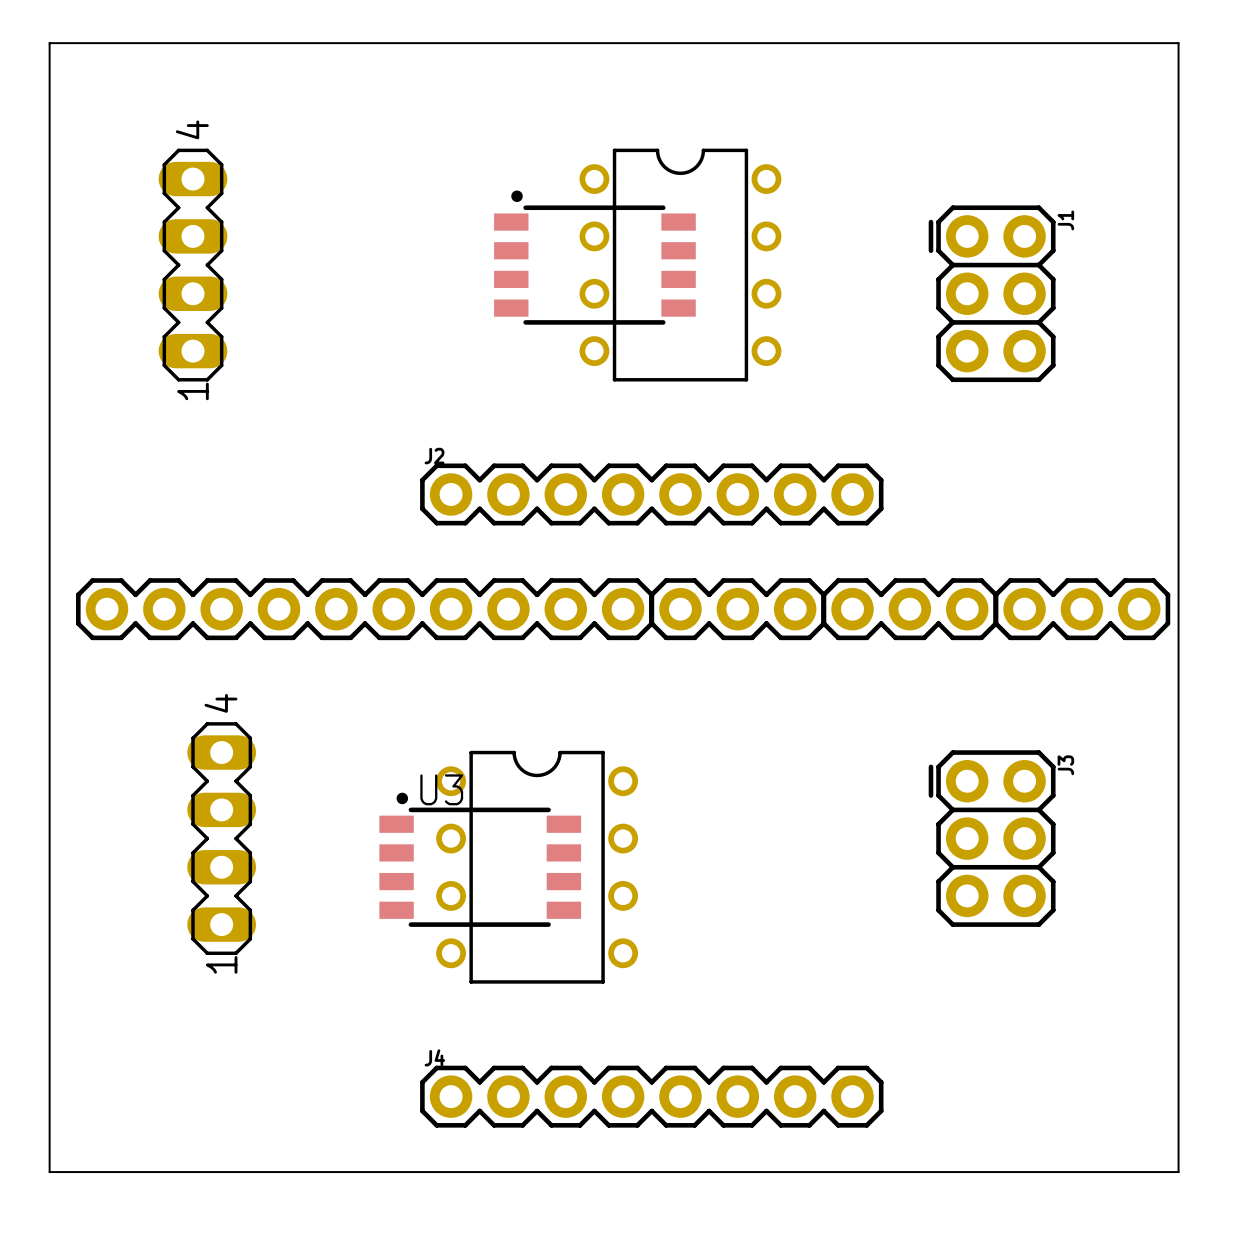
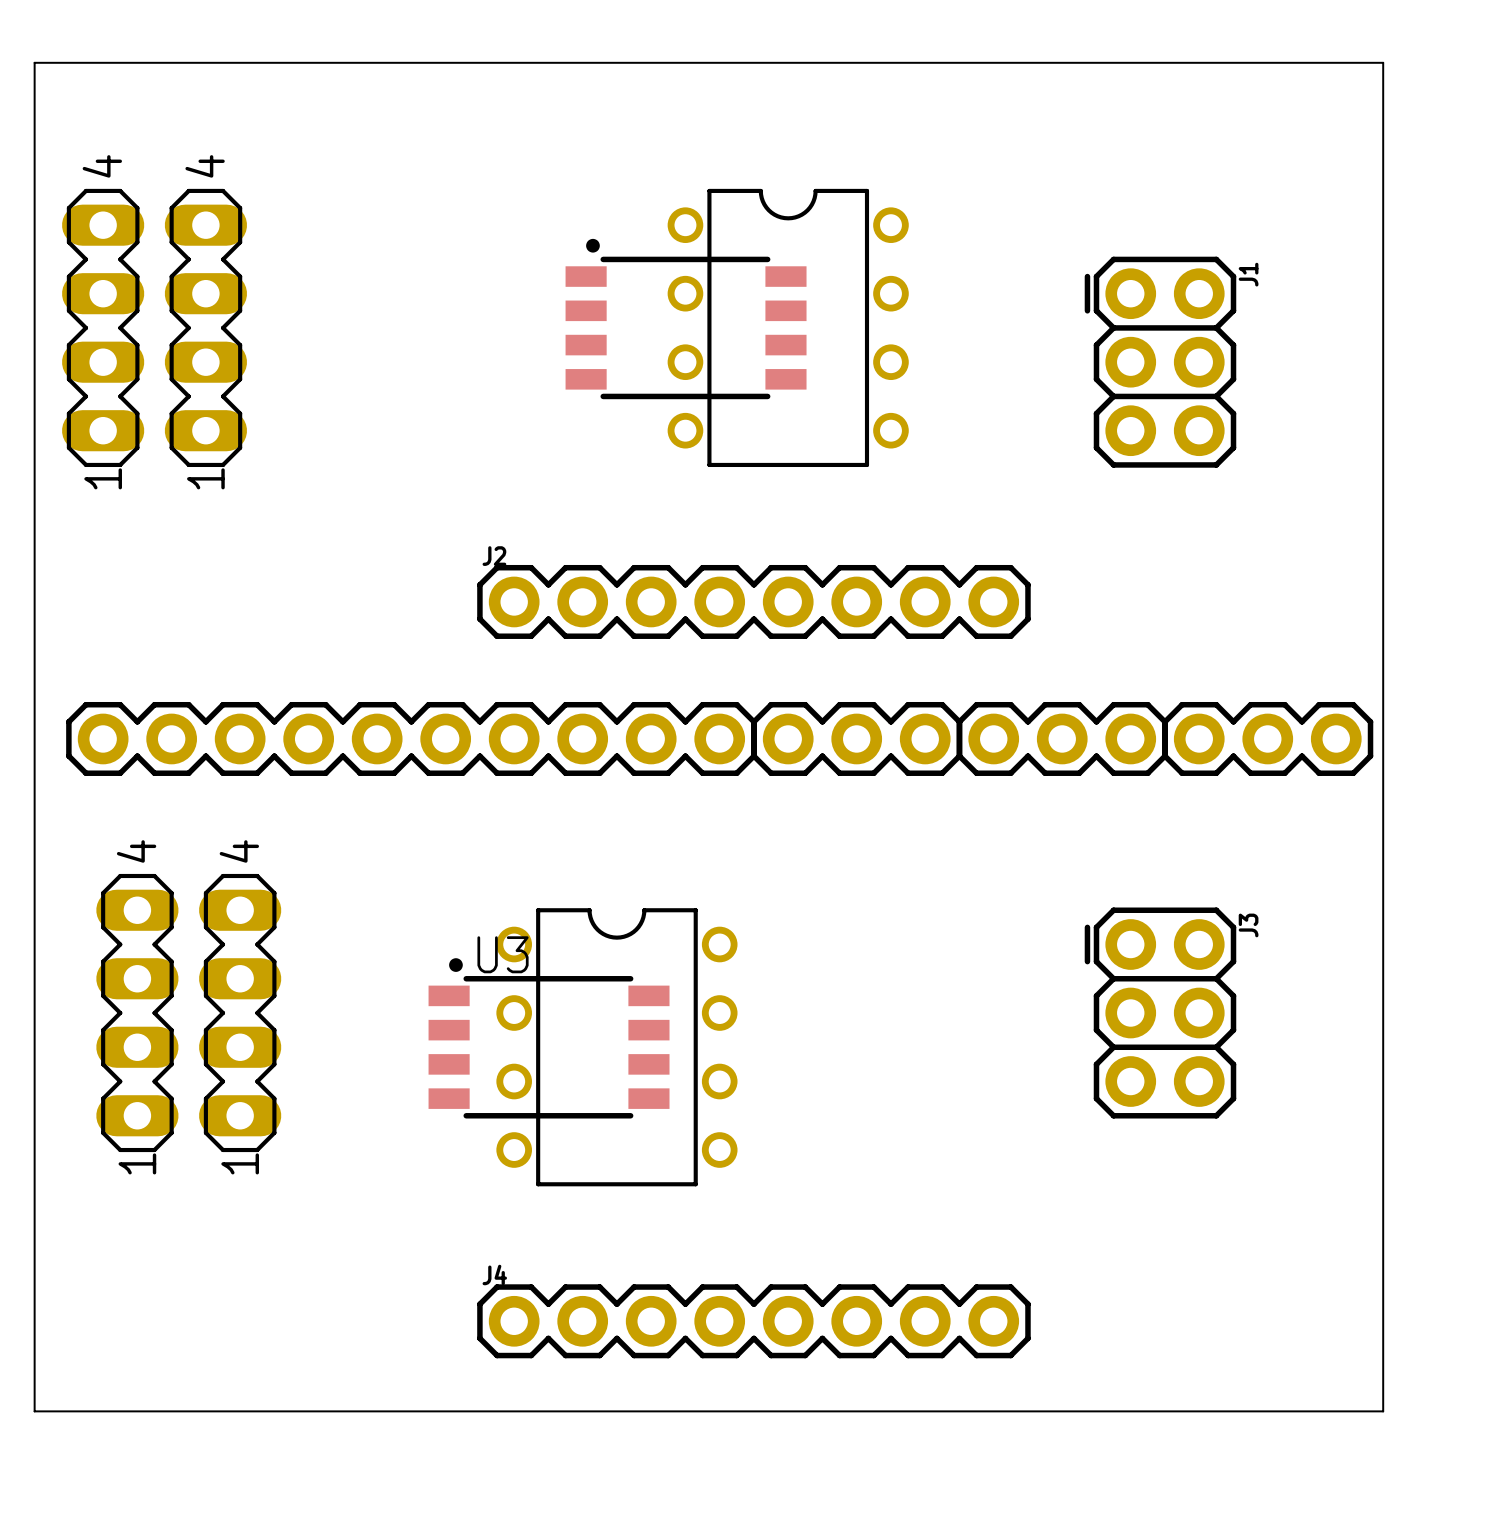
part: none -> (103, 327)
part: none -> (137, 1013)

